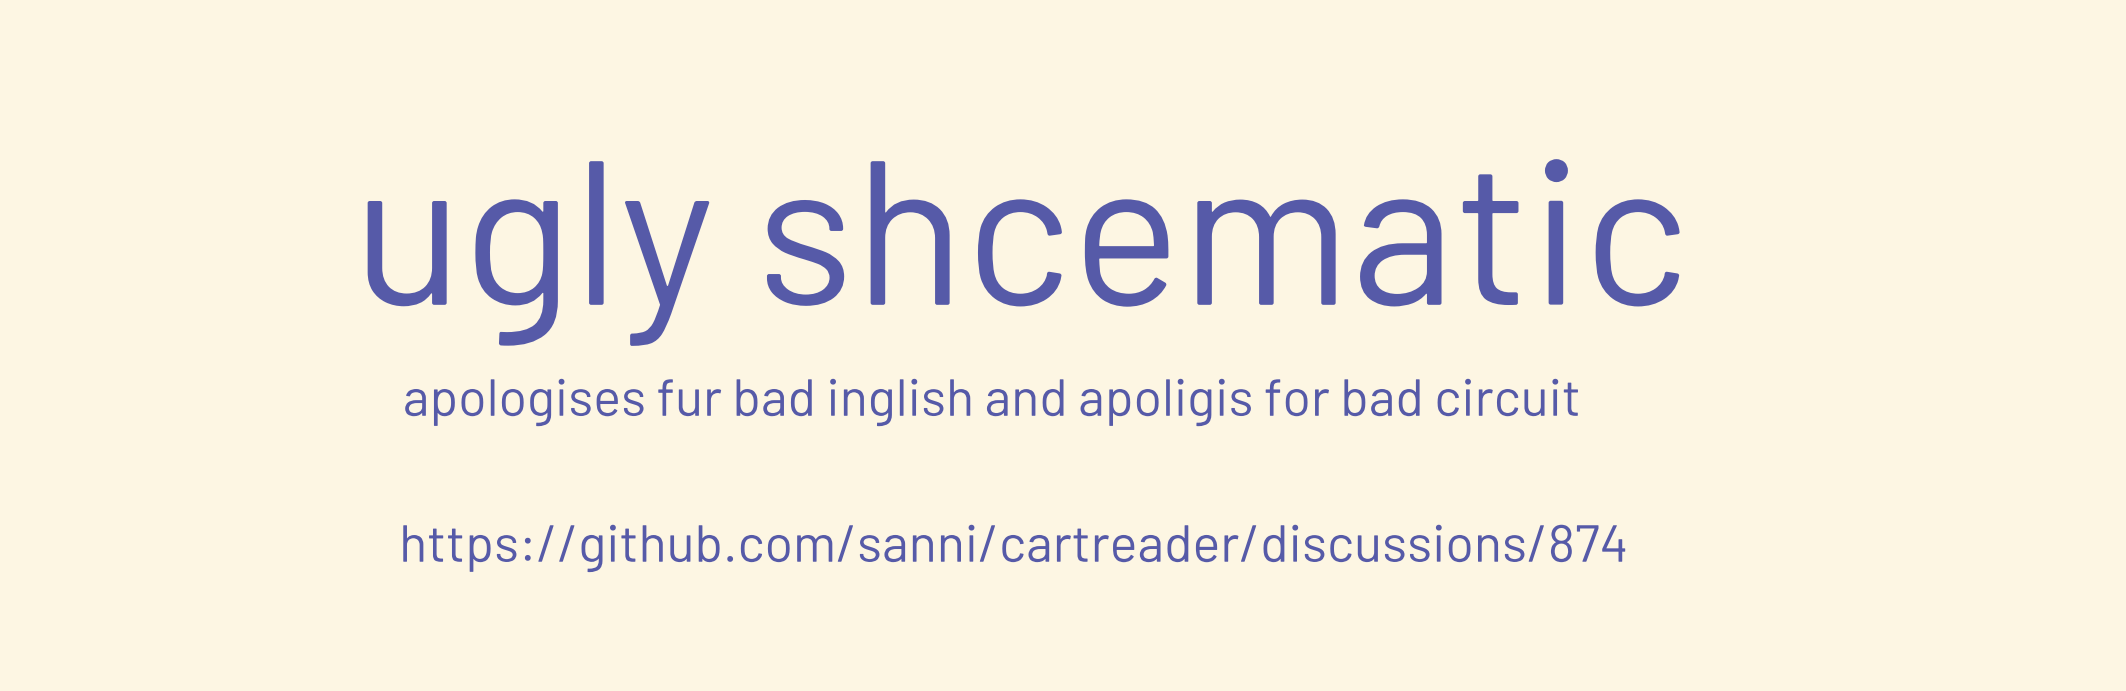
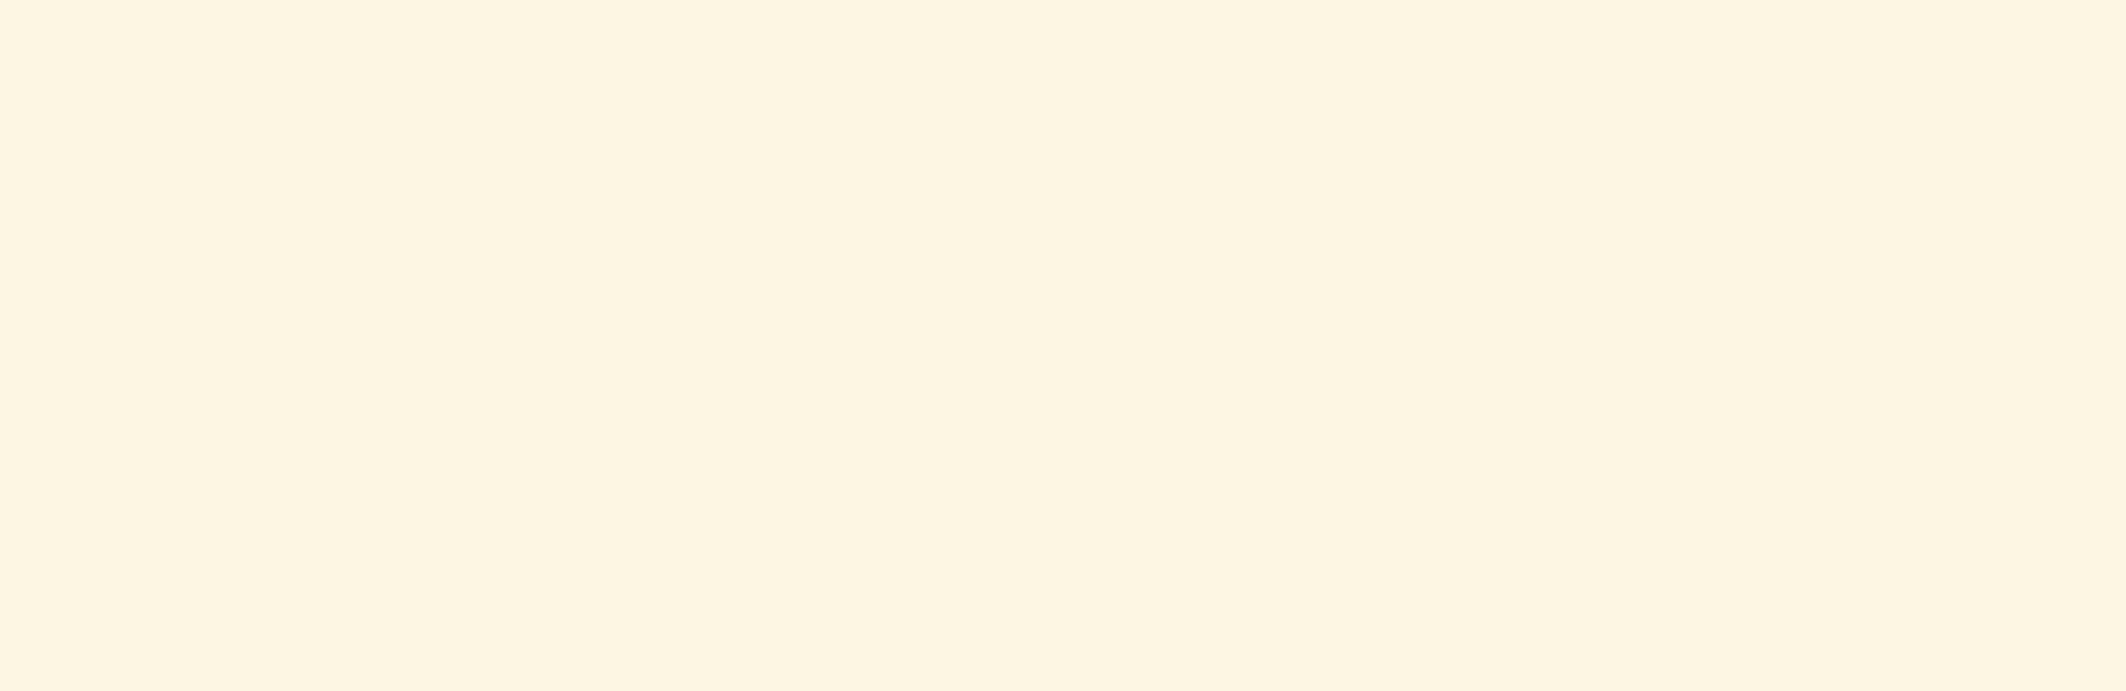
text: ugly shcematic (1023, 252) -> none
text: apologises fur bad inglish and apoligis for bad circuit (991, 402) -> none
text: https://github.com/sanni/cartreader/discussions/874 (1014, 548) -> none

